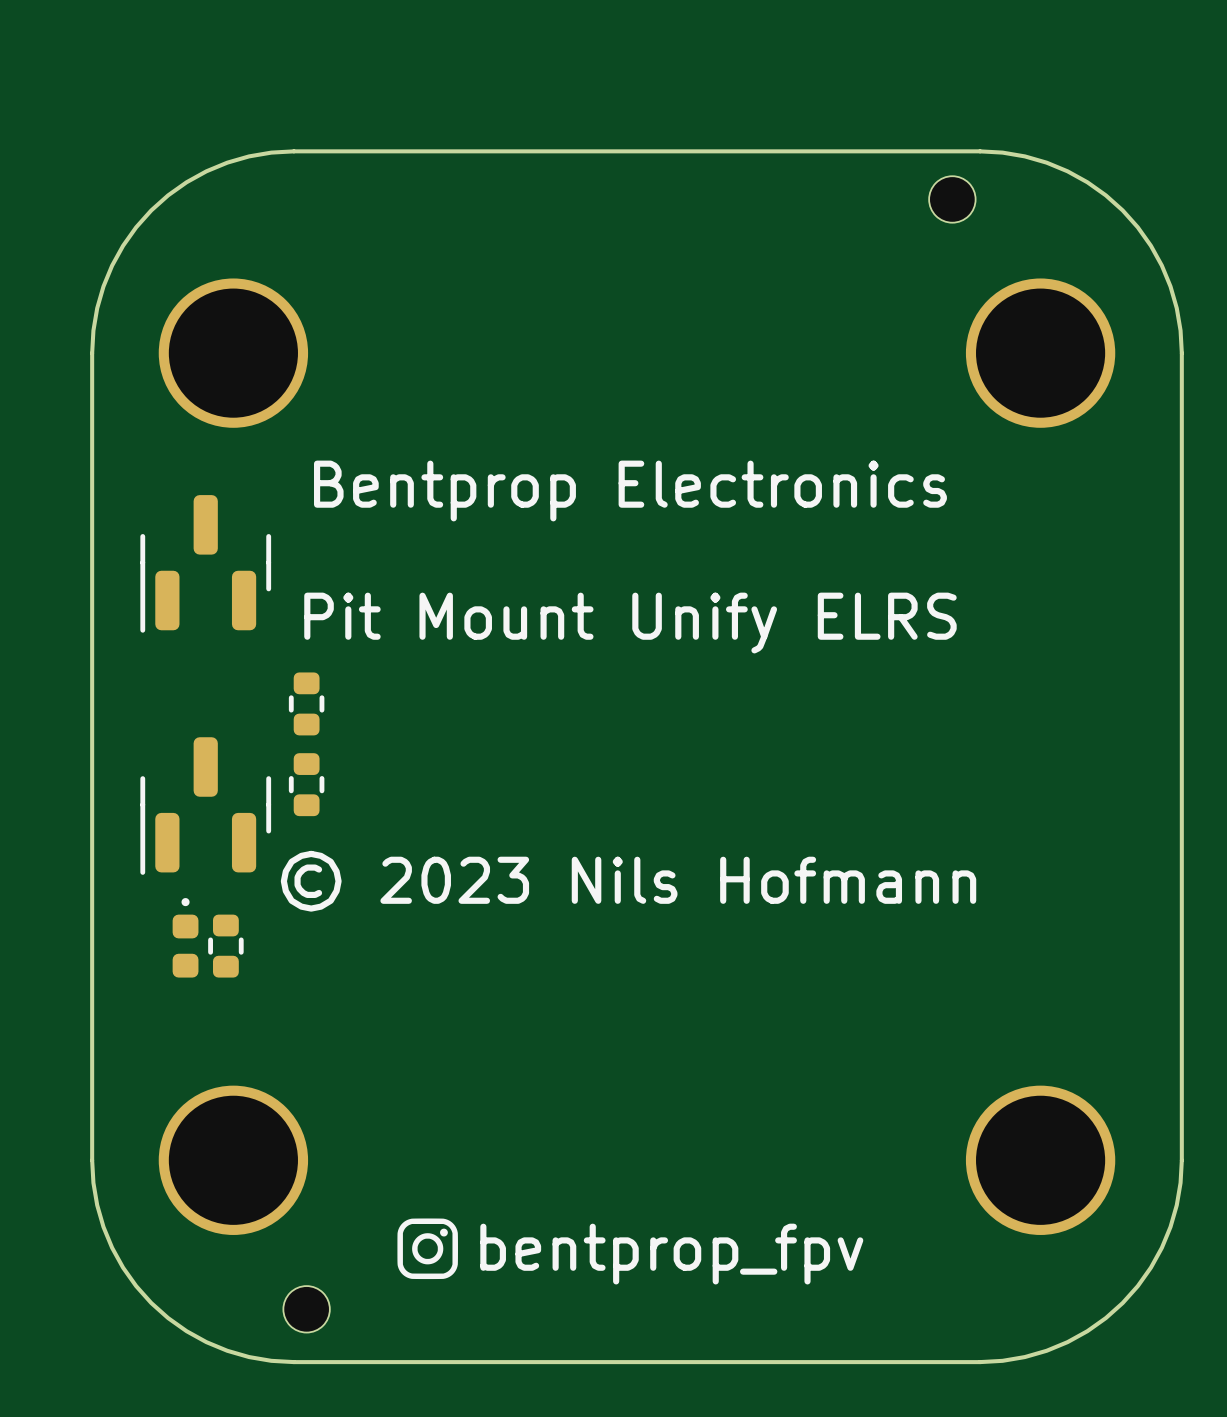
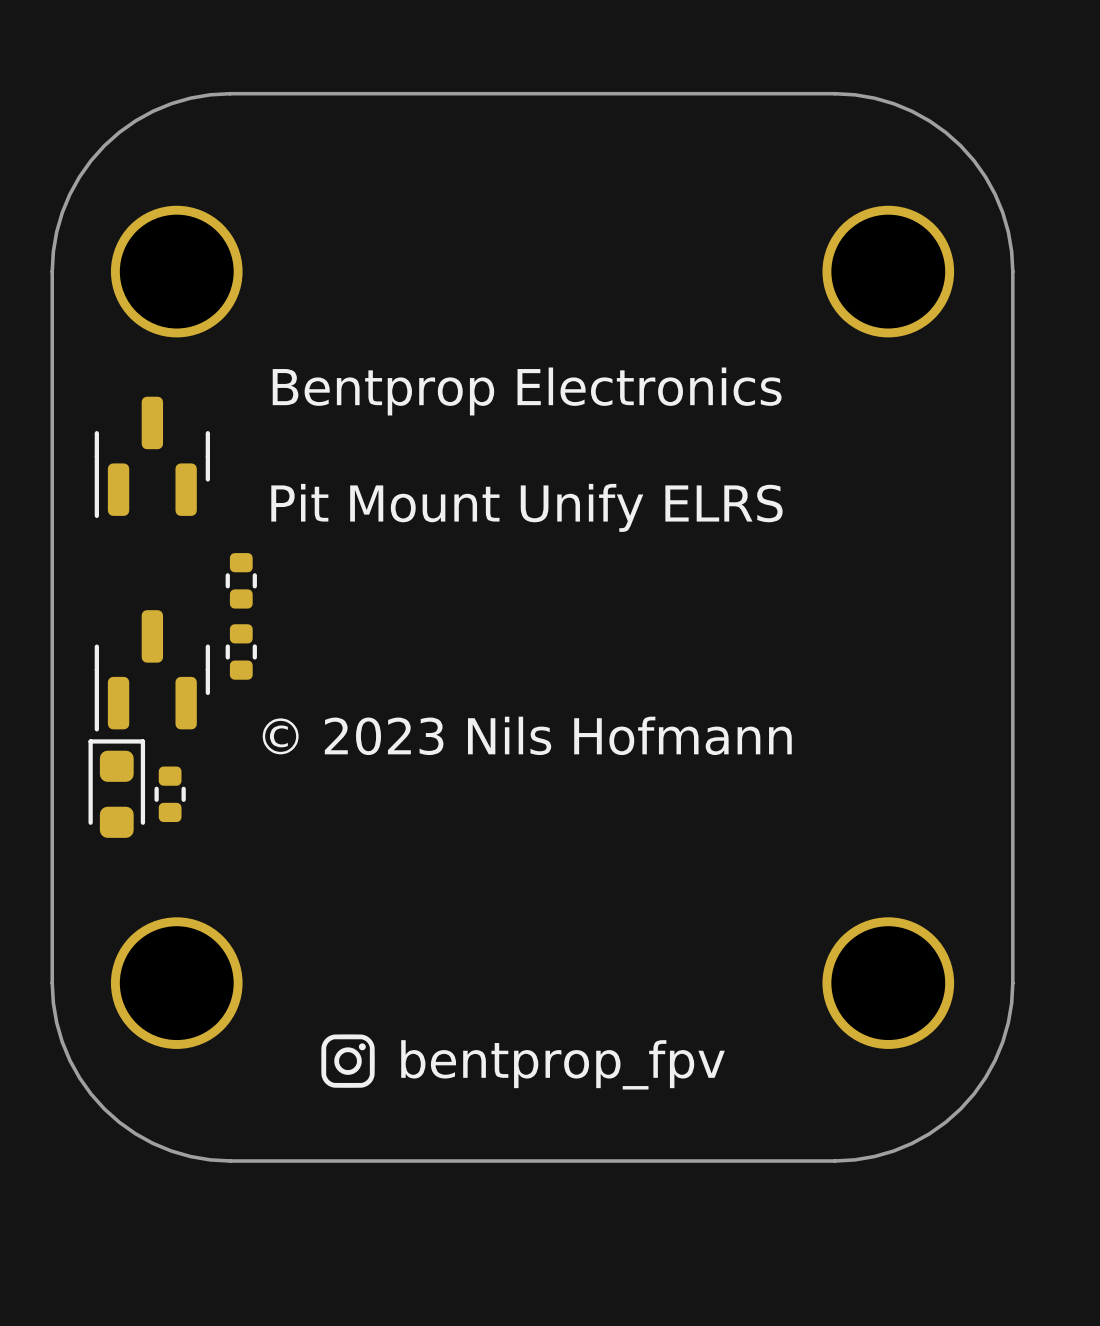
part: (952, 199) -> none
part footprint: [172, 898, 199, 978] -> [88, 739, 146, 838]
part: (306, 1309) -> none

